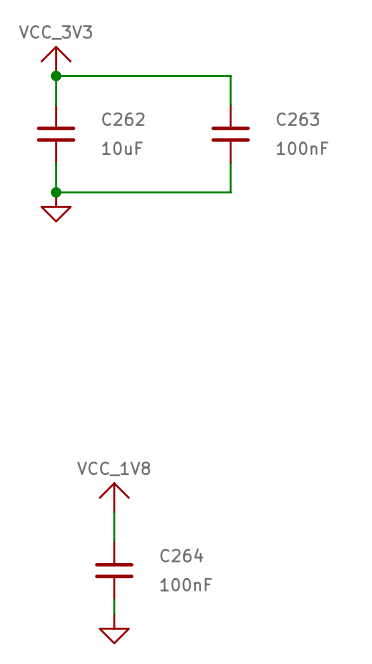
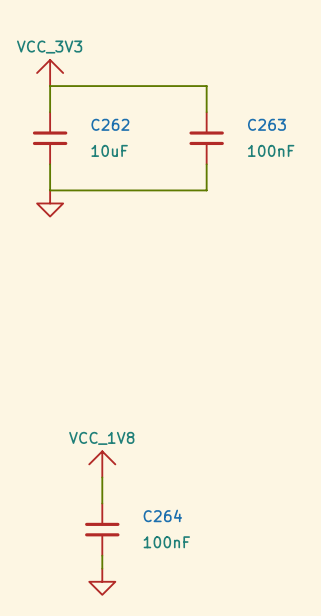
junction: (56, 76) -> none
junction: (56, 192) -> none

